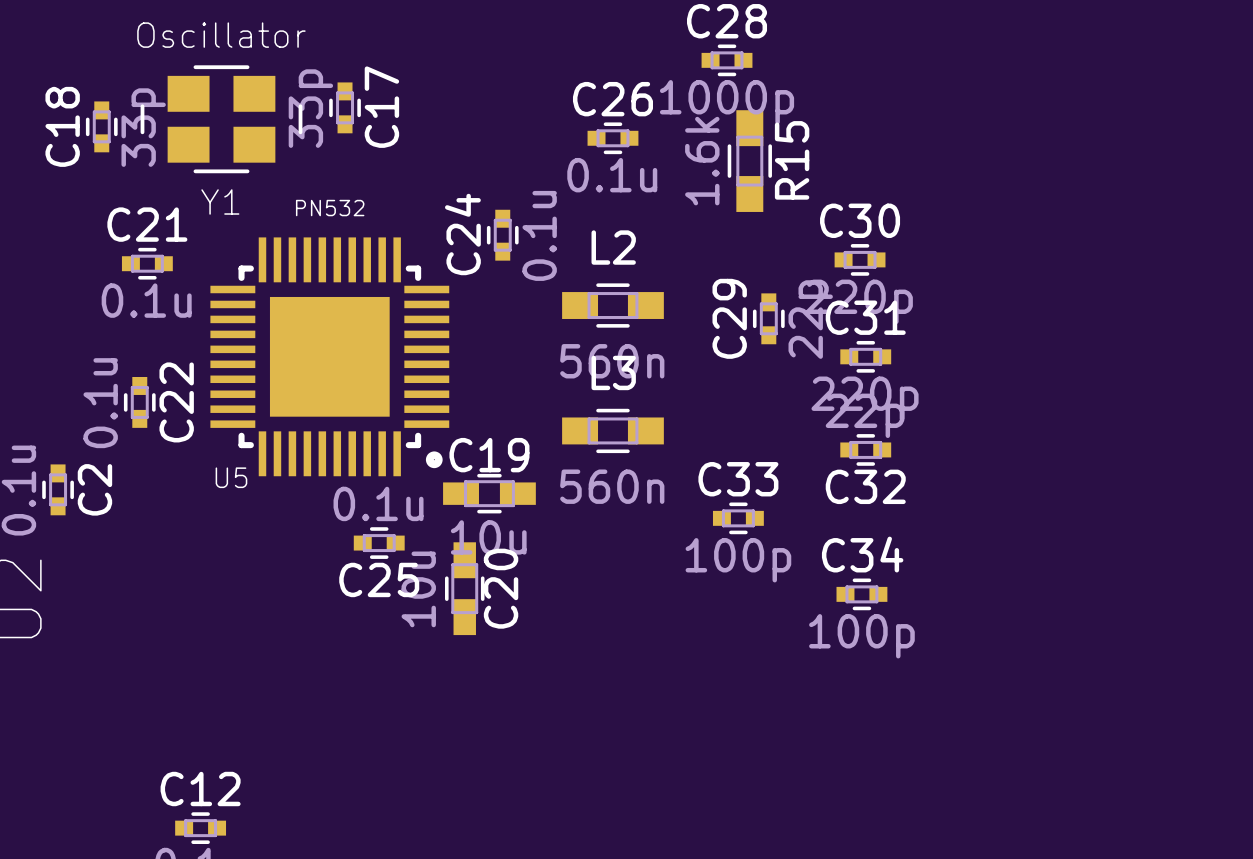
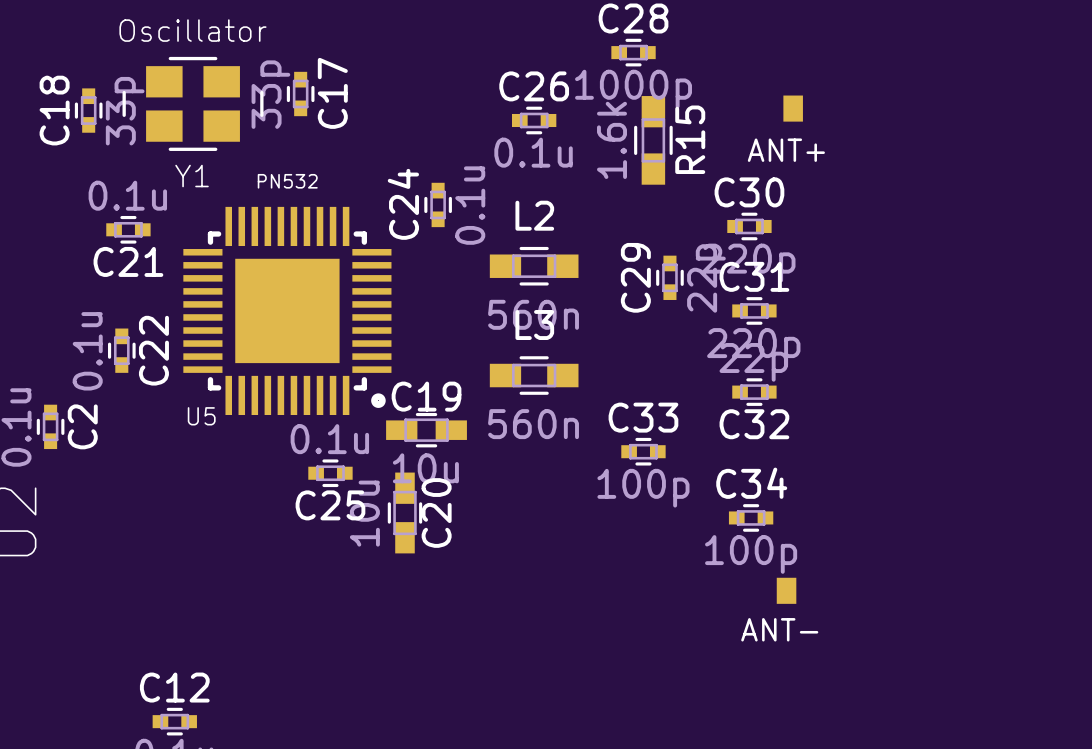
ANT+: none -> (793, 108)
C21 name position: C21 (147, 224) -> C21 (128, 261)
C21 value position: 0.1u (146, 300) -> 0.1u (127, 195)
ANT-: none -> (786, 590)

